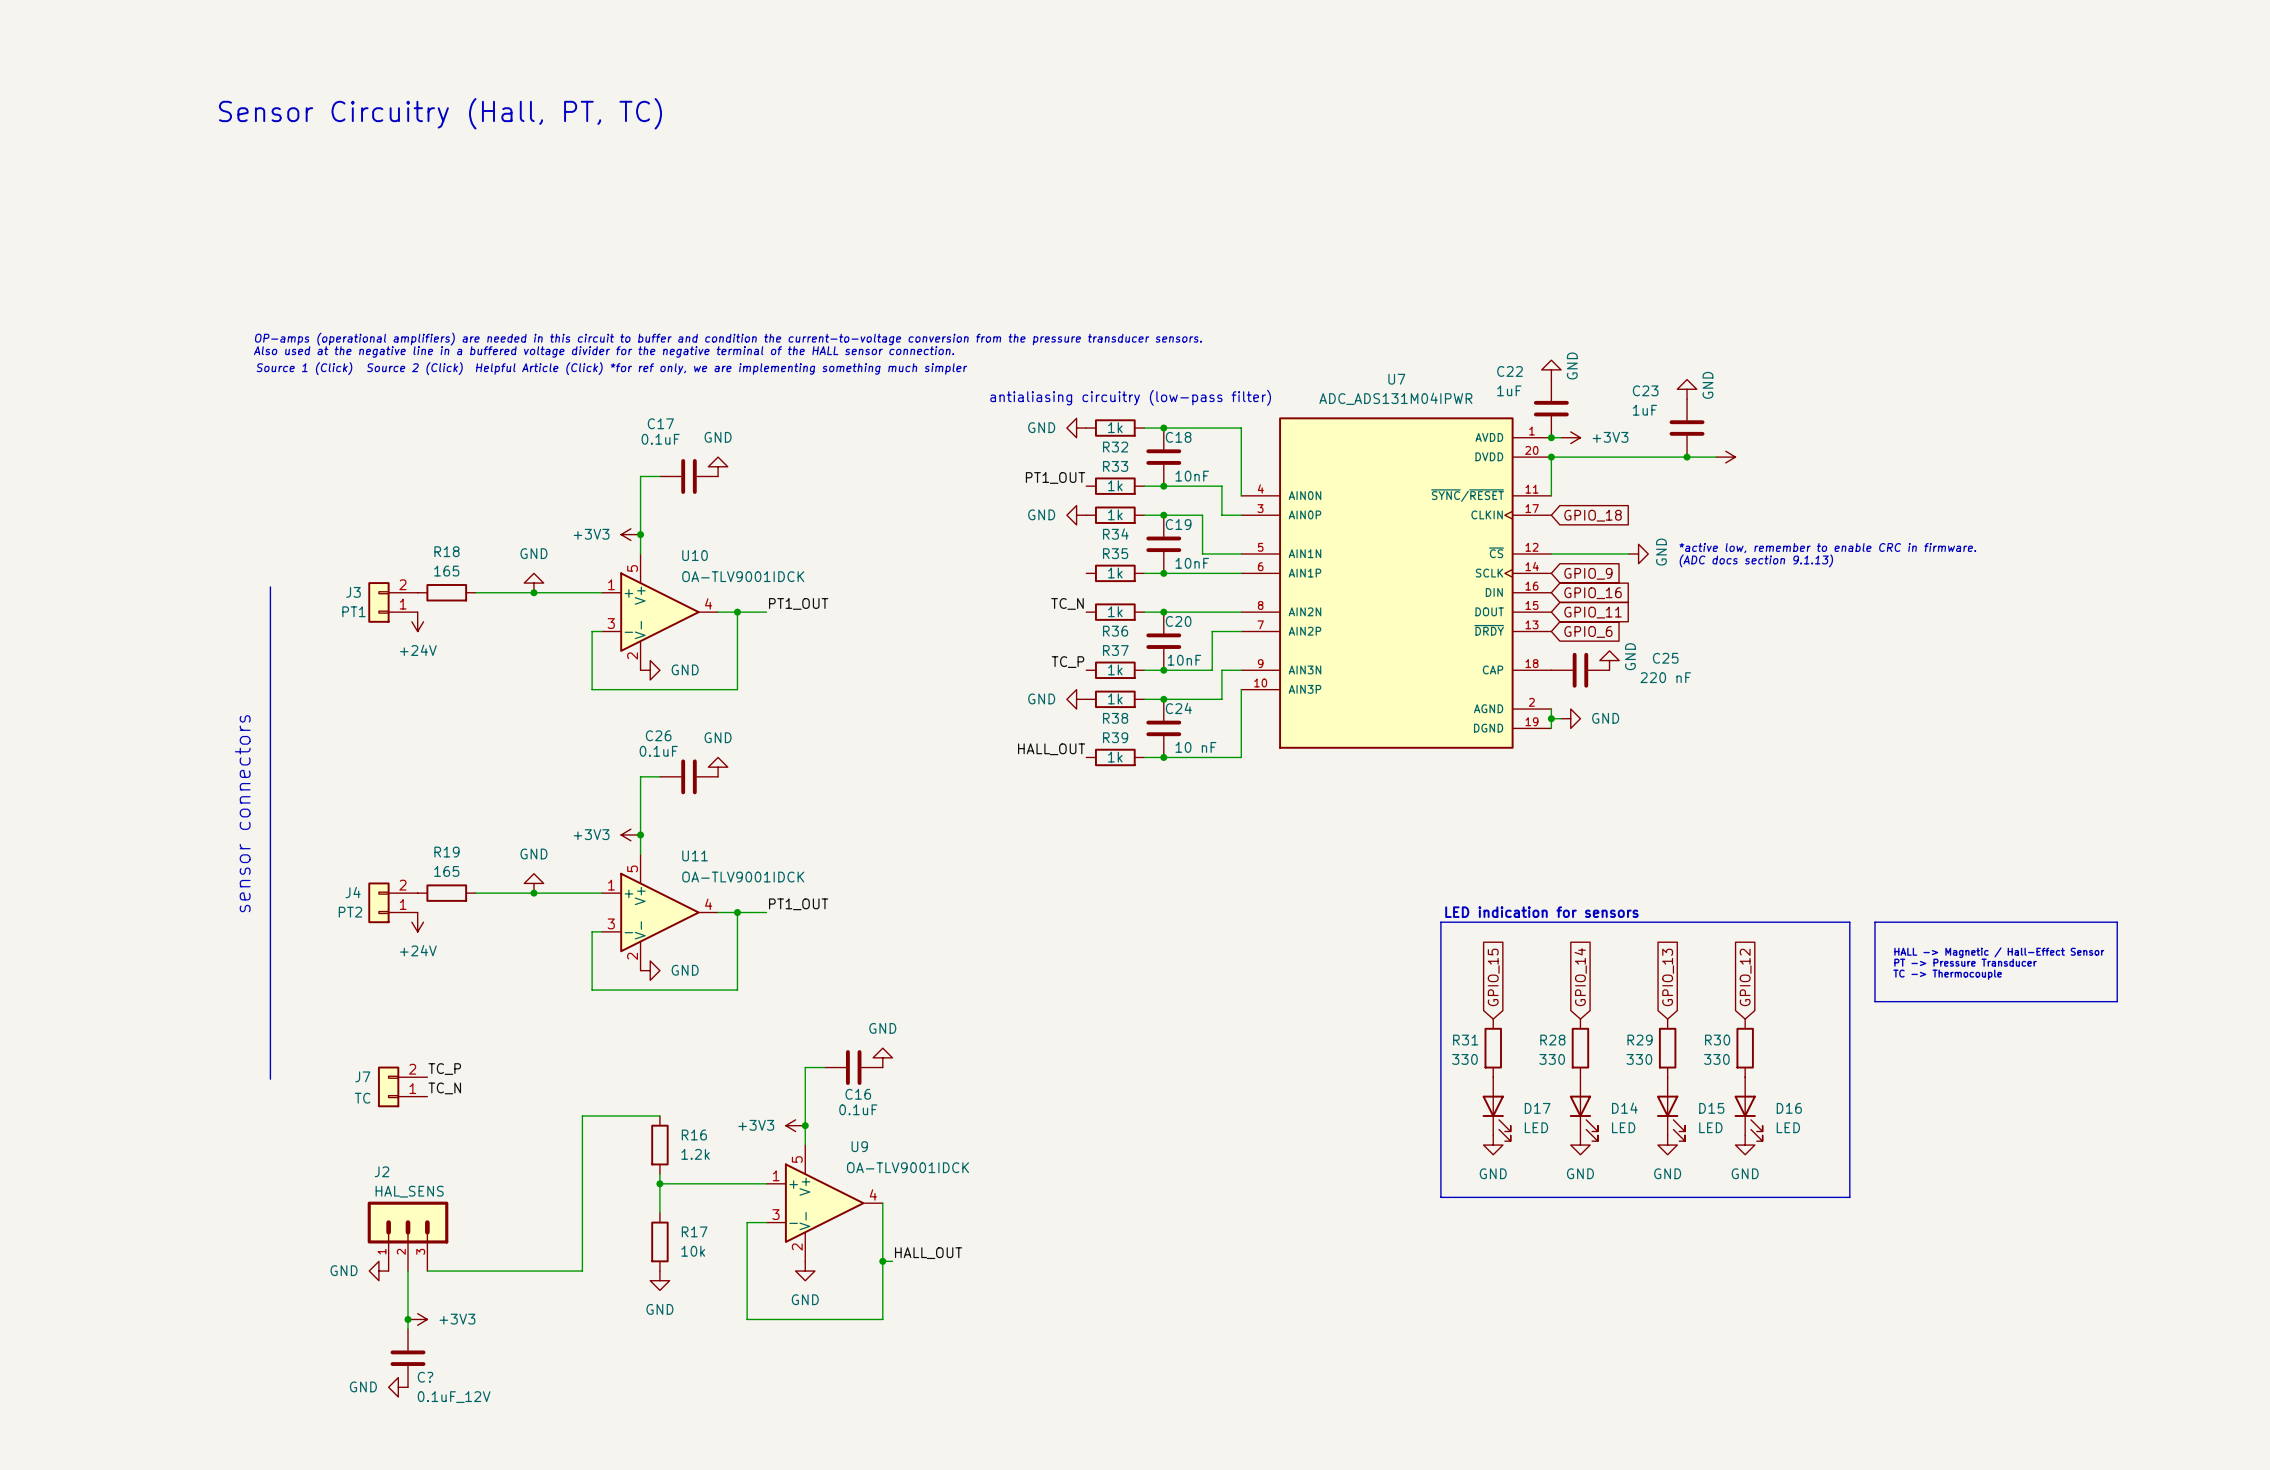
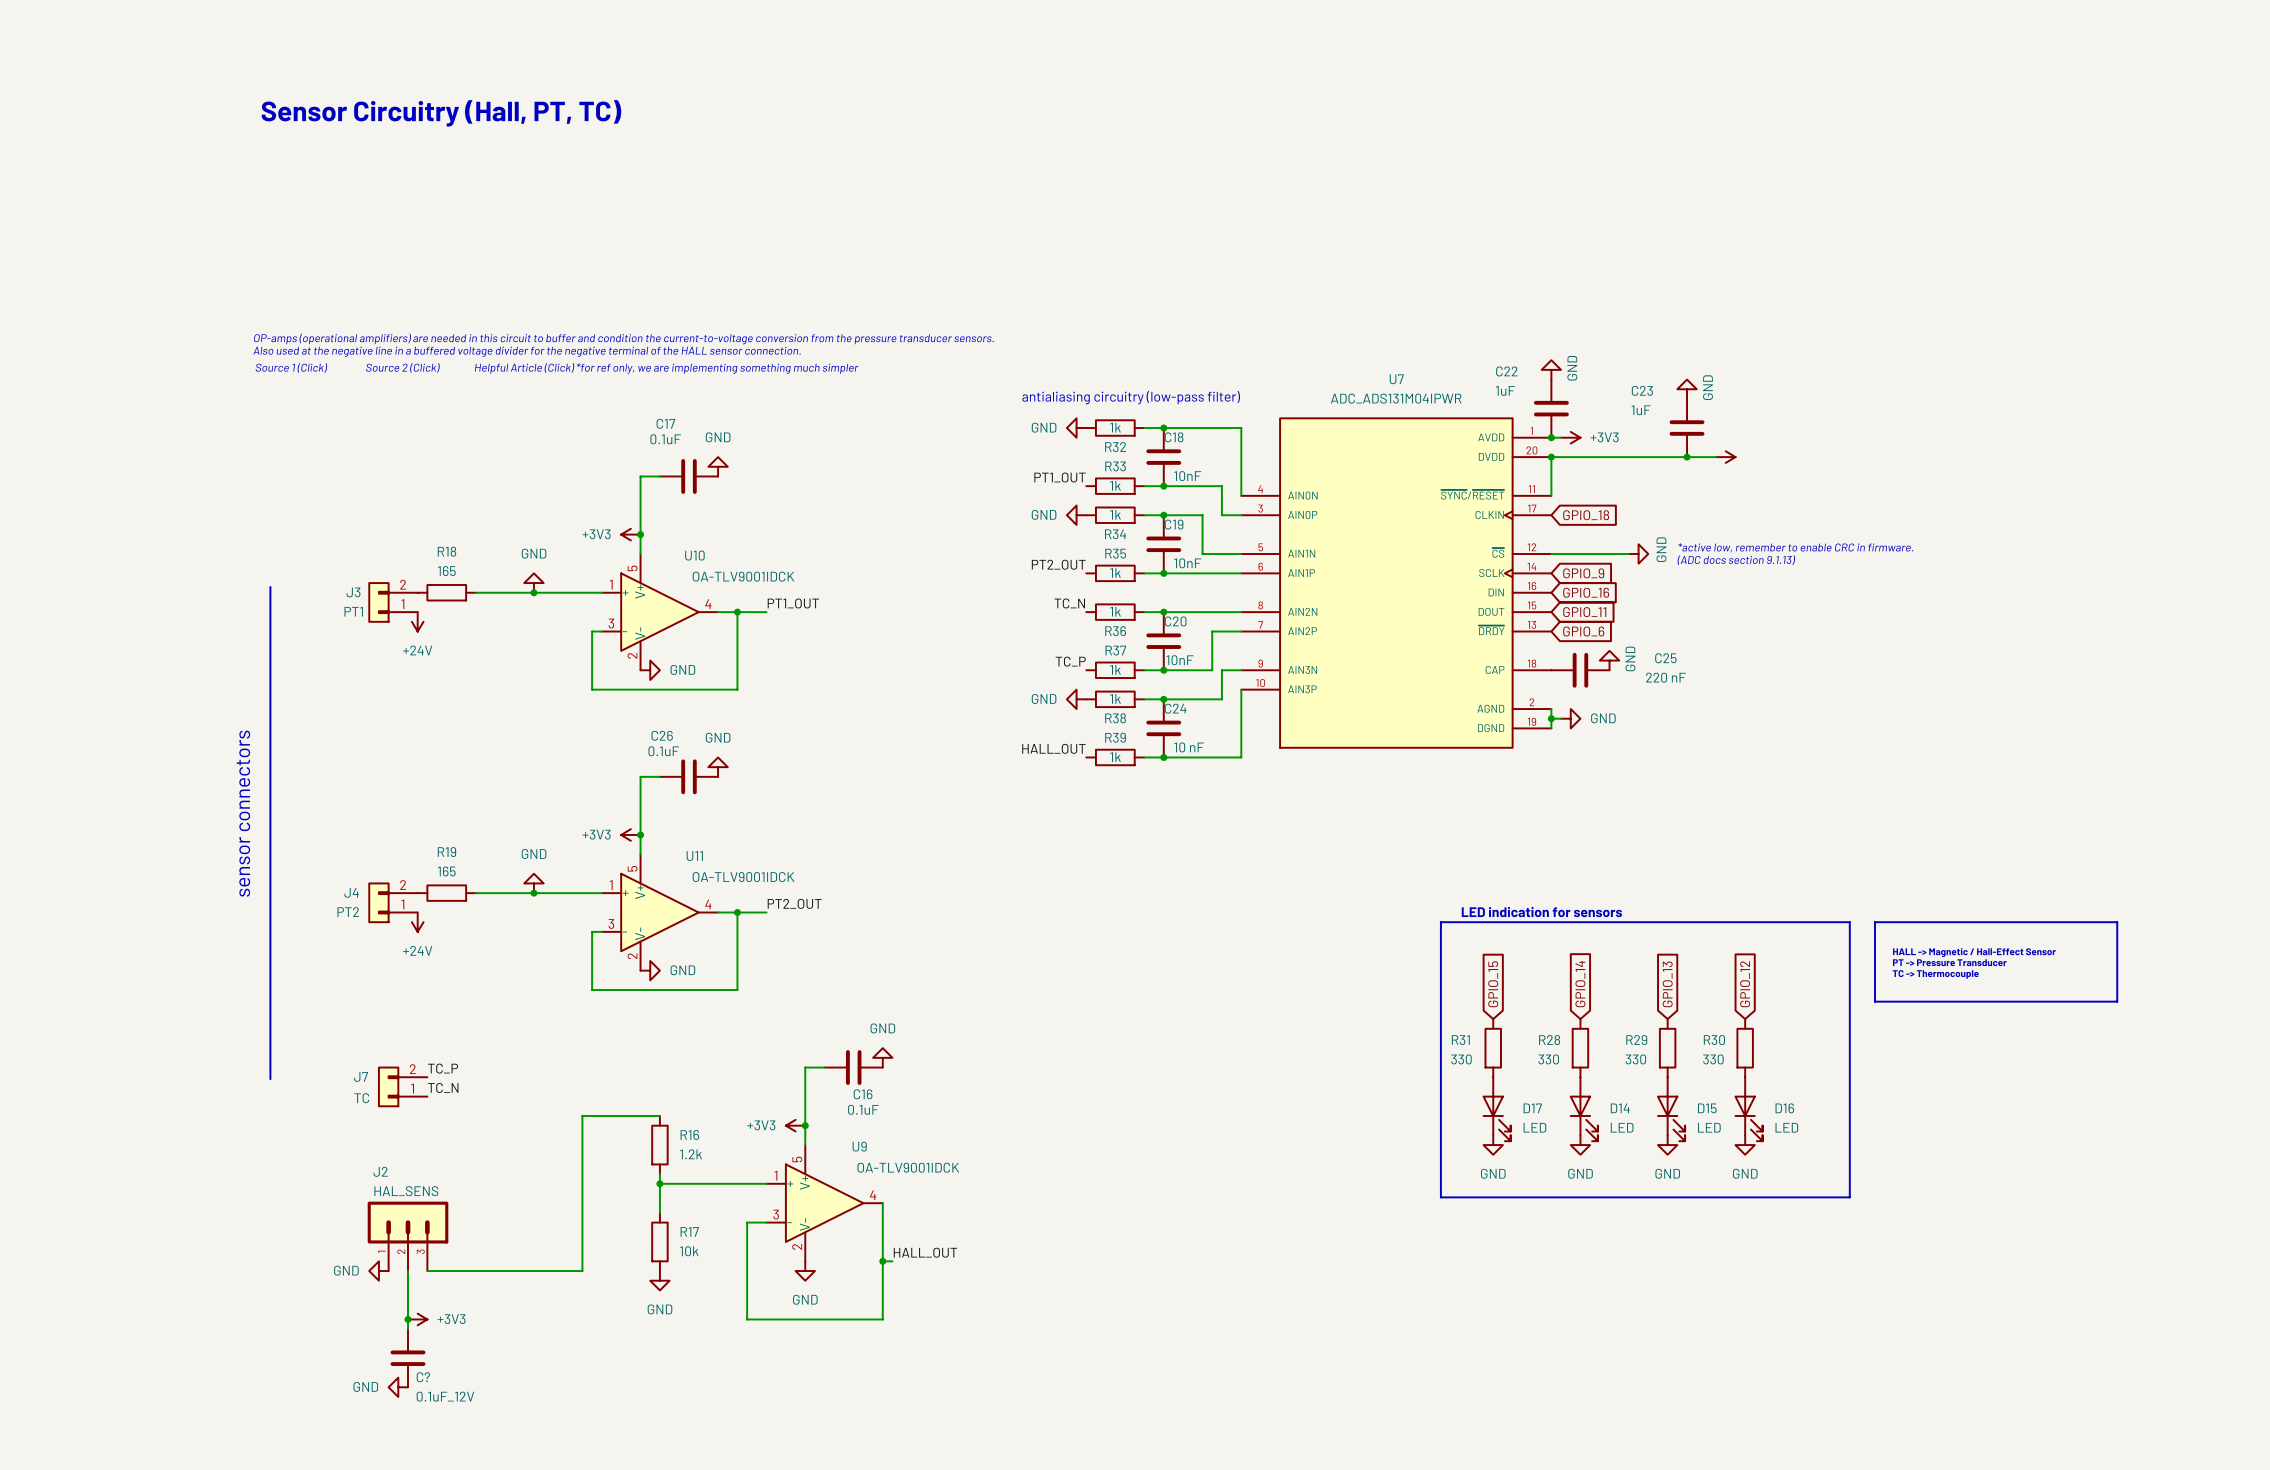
label: none -> PT2_OUT (1058, 564)
label: PT1_OUT (798, 904) -> PT2_OUT (794, 903)

